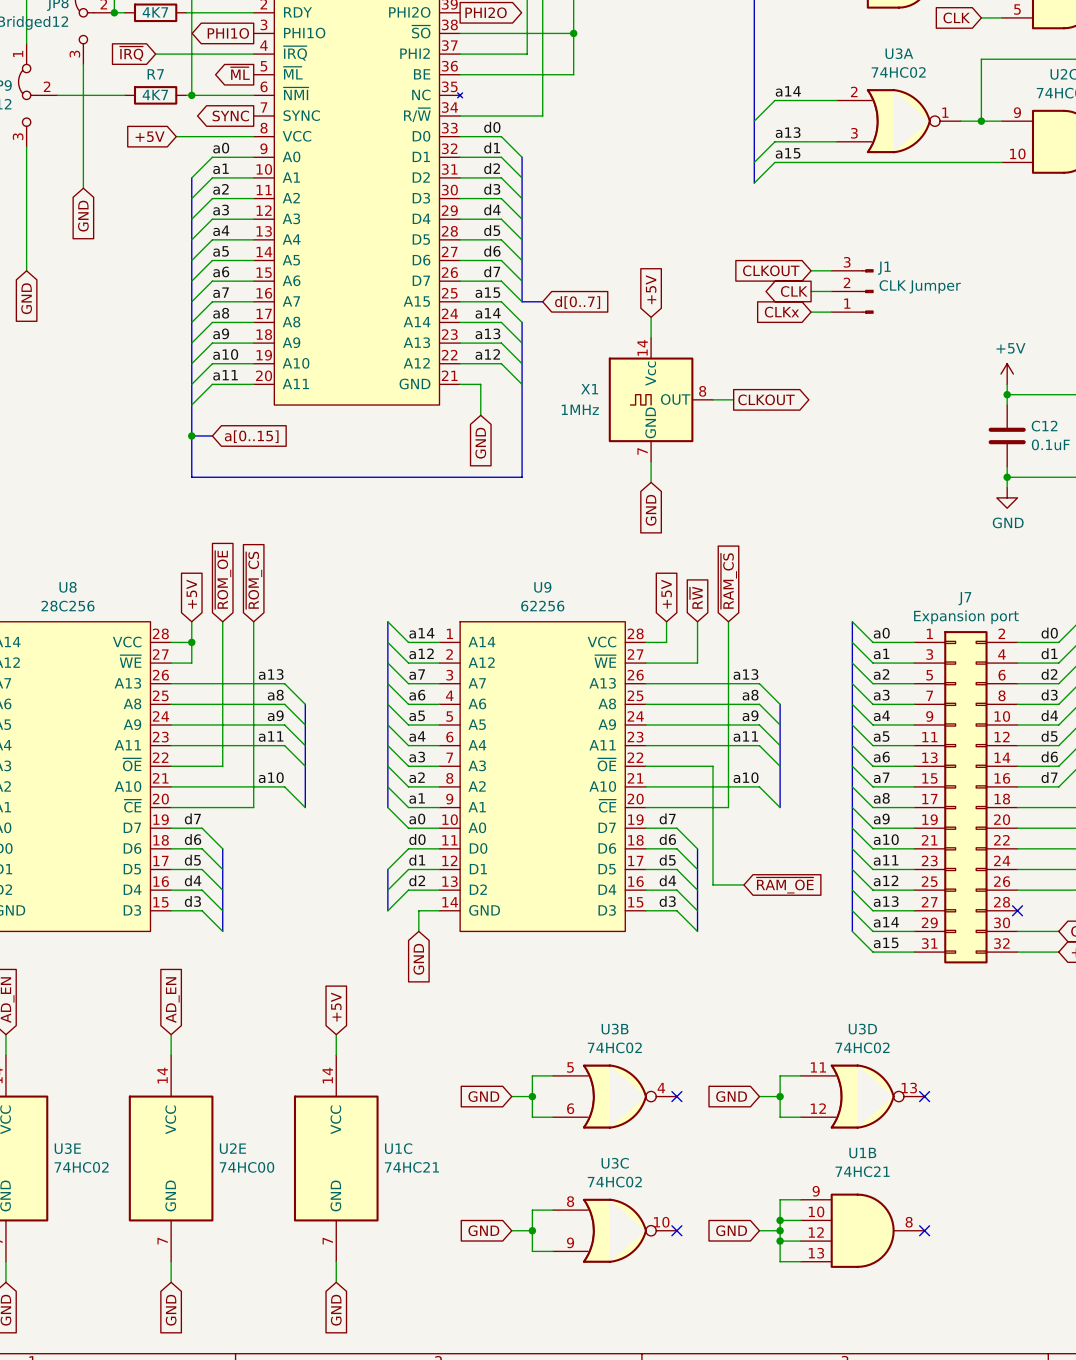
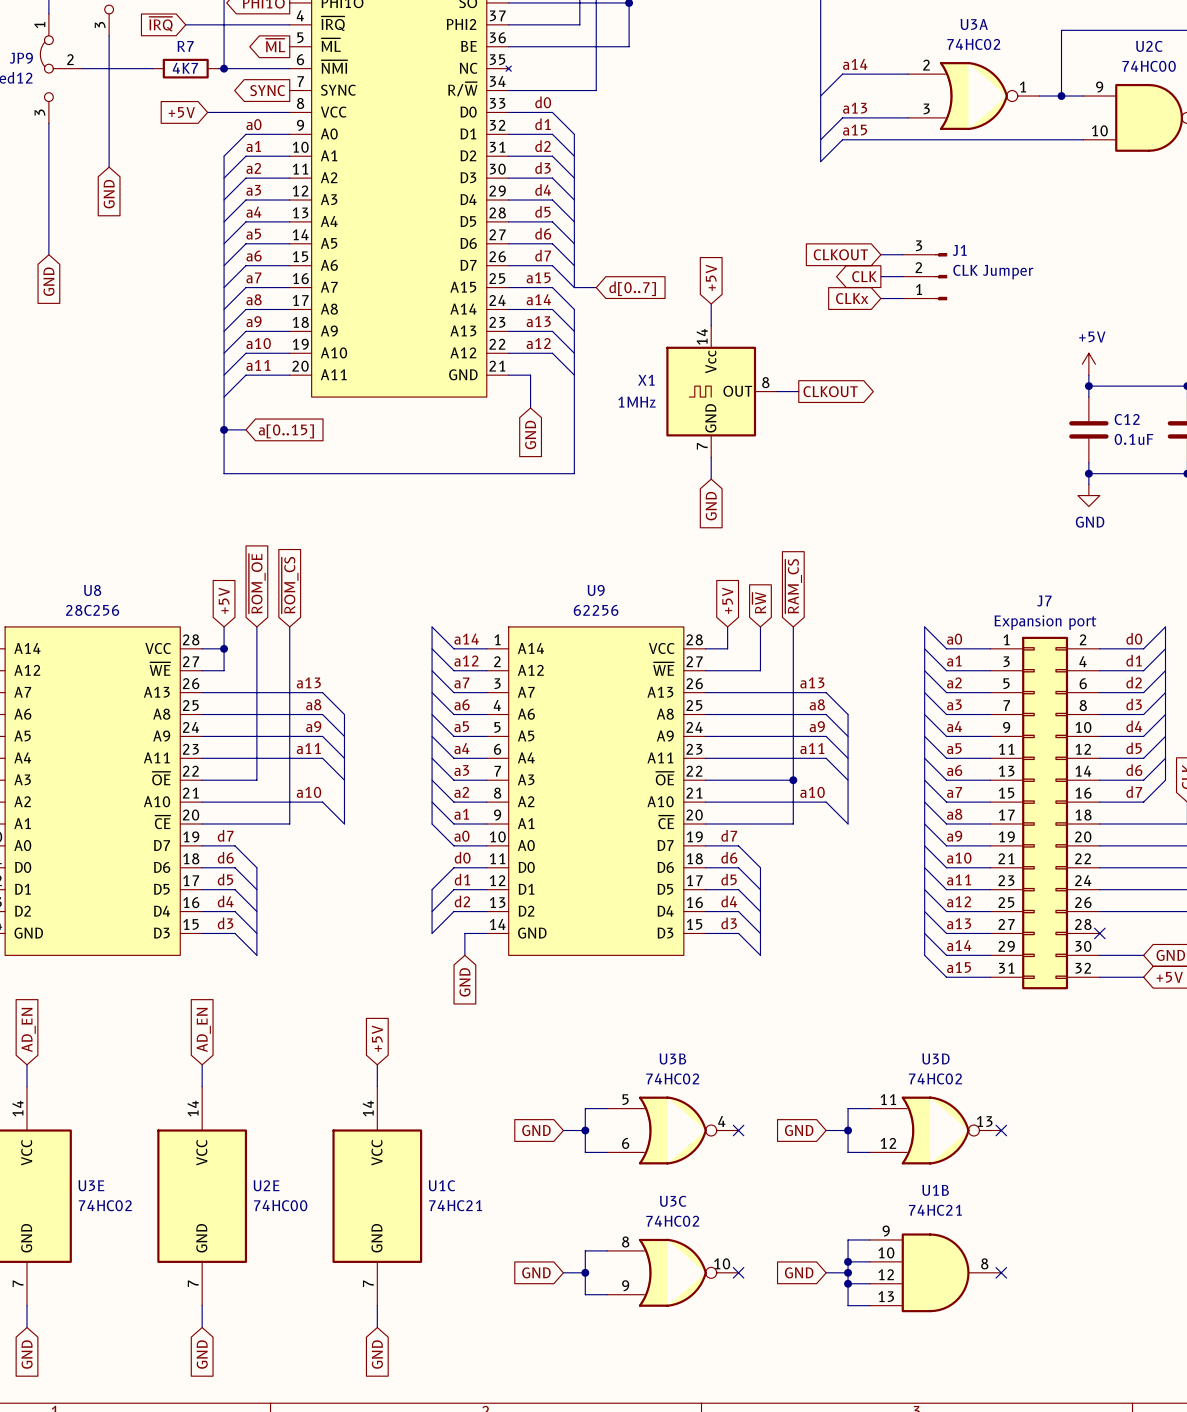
wire: (713, 766) (713, 884) (743, 884) -> (776, 780) (793, 780)
junction: none -> (793, 780)
global label: ~{RAM_OE} (785, 885) -> none

